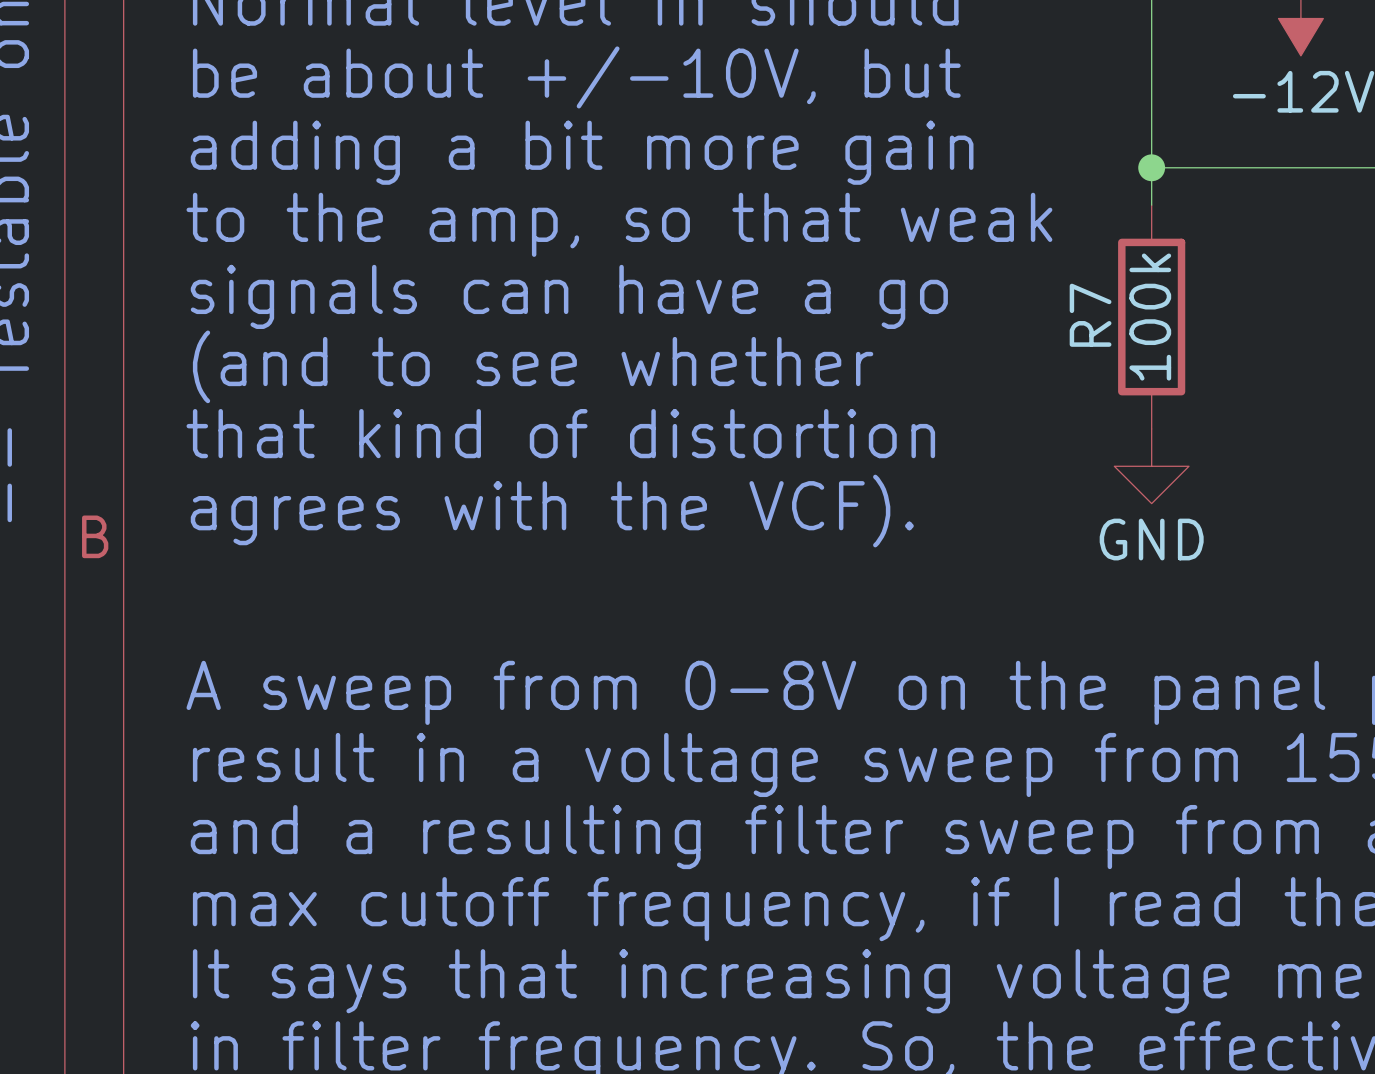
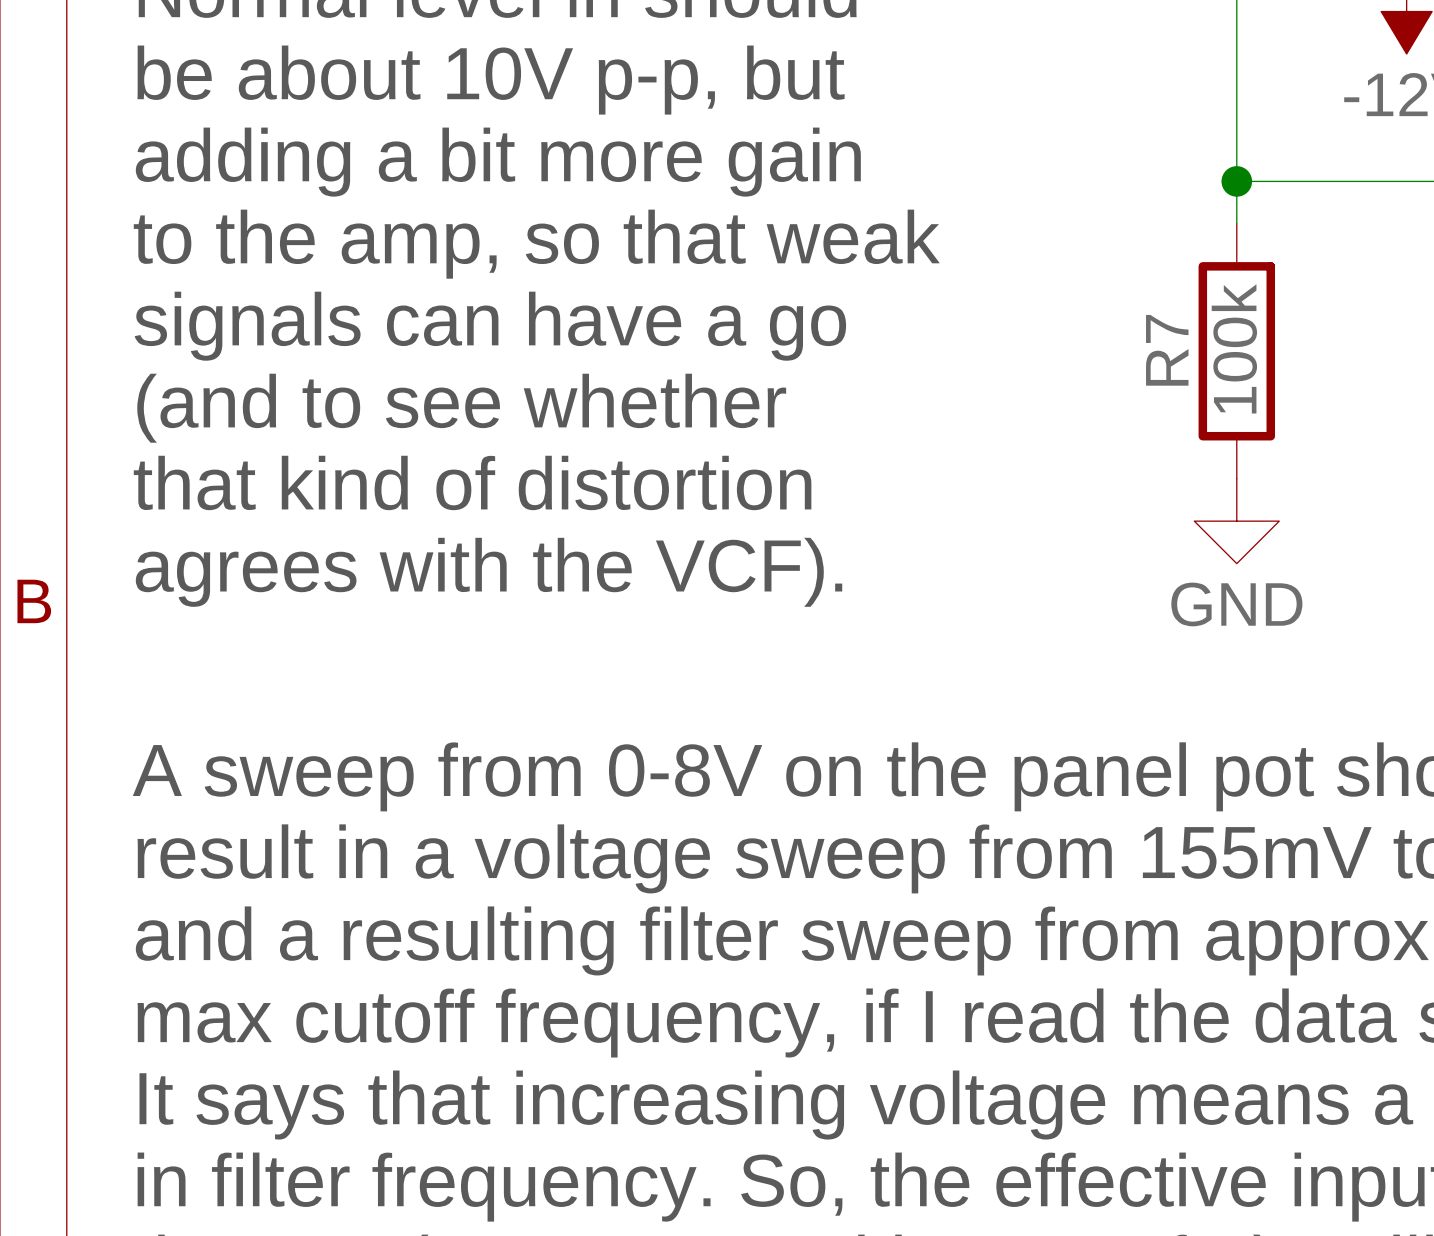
text: be about +/-10V, but (576, 77) -> be about 10V p-p, but (491, 80)

